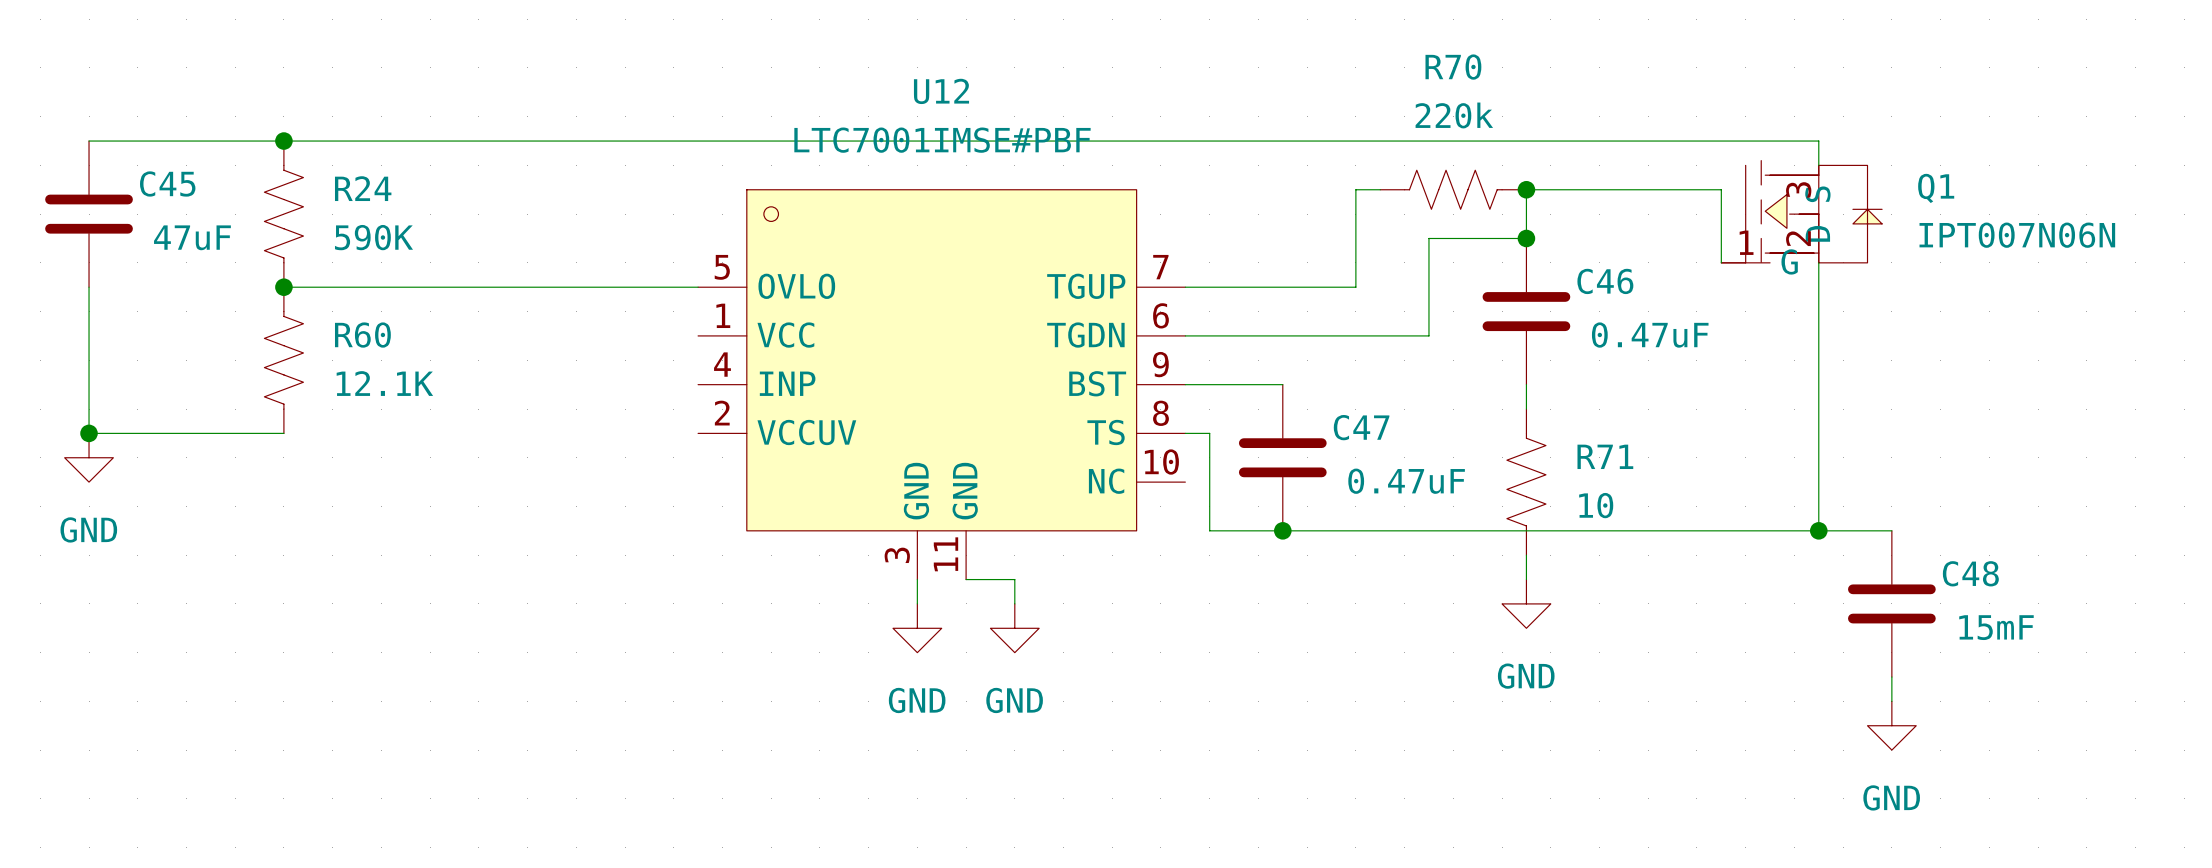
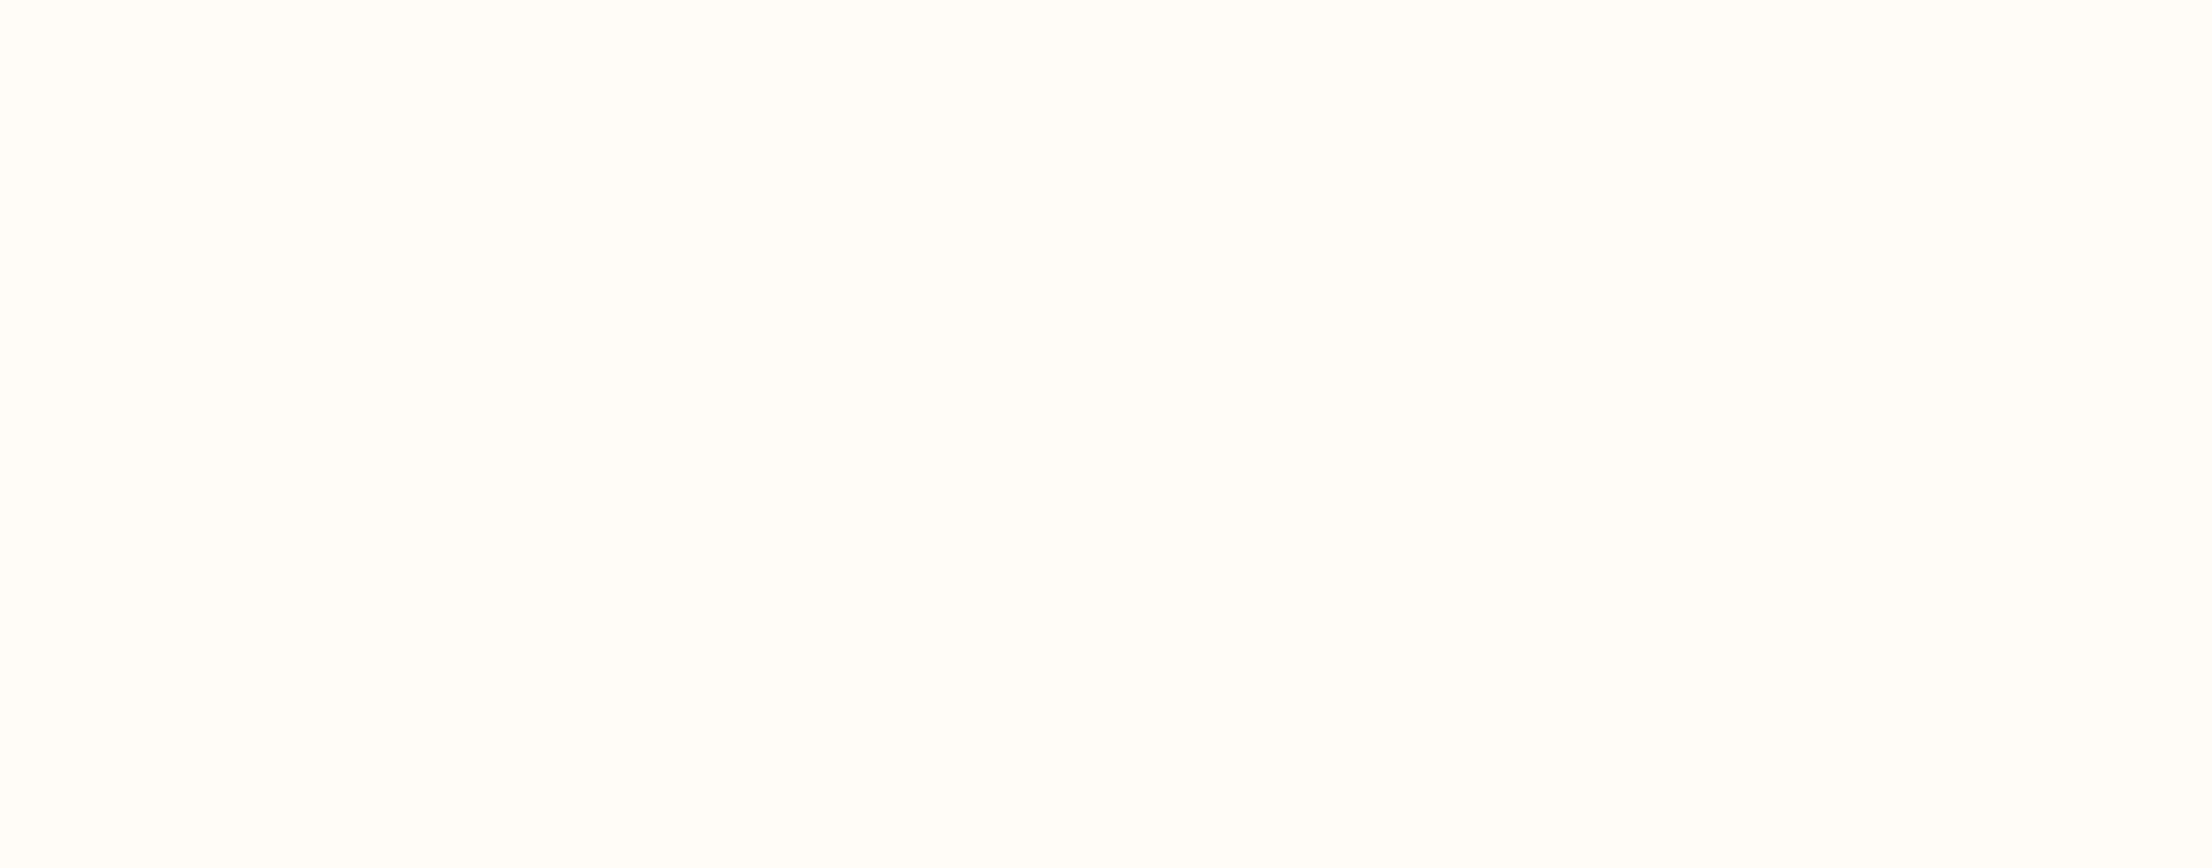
wire: (89, 141) (1818, 141) (1818, 165) -> none
junction: (283, 141) -> none
wire: (1380, 189) (1355, 189) (1355, 287) (1185, 287) -> none
R70: 220k (1453, 189) -> none
junction: (1526, 189) -> none
Q1: IPT007N06N (1801, 211) -> none
C45: 47uF (89, 214) -> none
R24: 590K (283, 214) -> none
junction: (1526, 238) -> none
wire: (1721, 262) (1721, 189) (1526, 189) (1526, 238) (1428, 238) (1428, 335) (1185, 335) -> none
wire: (1818, 262) (1818, 530) -> none
wire: (89, 287) (89, 433) (283, 433) -> none
wire: (283, 287) (698, 287) -> none
junction: (283, 287) -> none
C46: 0.47uF (1526, 311) -> none
R60: 12.1K (283, 360) -> none
U12: LTC7001IMSE#PBF (941, 384) -> none
wire: (1185, 384) (1282, 384) -> none
wire: (1526, 384) (1526, 409) -> none
junction: (89, 433) -> none
wire: (1185, 433) (1209, 433) (1209, 530) (1891, 530) -> none
power symbol: GND (89, 457) -> none
C47: 0.47uF (1282, 457) -> none
R71: 10 (1526, 482) -> none
junction: (1282, 530) -> none
junction: (1818, 530) -> none
wire: (1526, 555) (1526, 579) -> none
wire: (917, 579) (917, 603) -> none
wire: (966, 579) (1014, 579) (1014, 603) -> none
power symbol: GND (1526, 603) -> none
C48: 15mF (1891, 603) -> none
power symbol: GND (917, 628) -> none
power symbol: GND (1014, 628) -> none
wire: (1891, 677) (1891, 701) -> none
power symbol: GND (1891, 725) -> none

